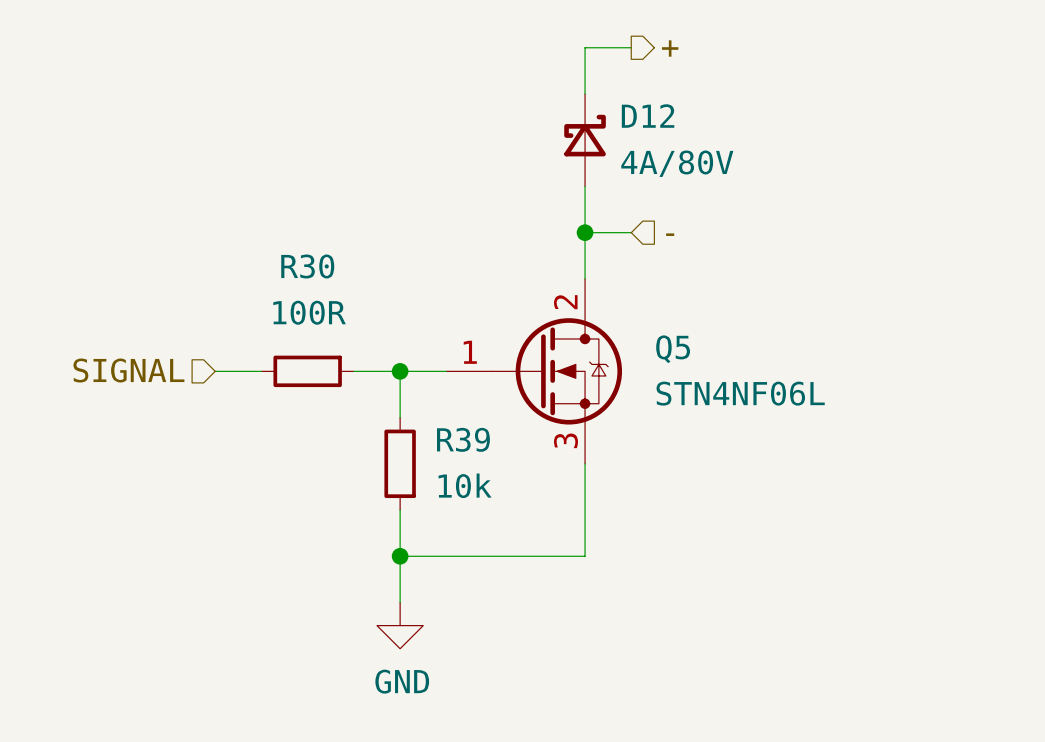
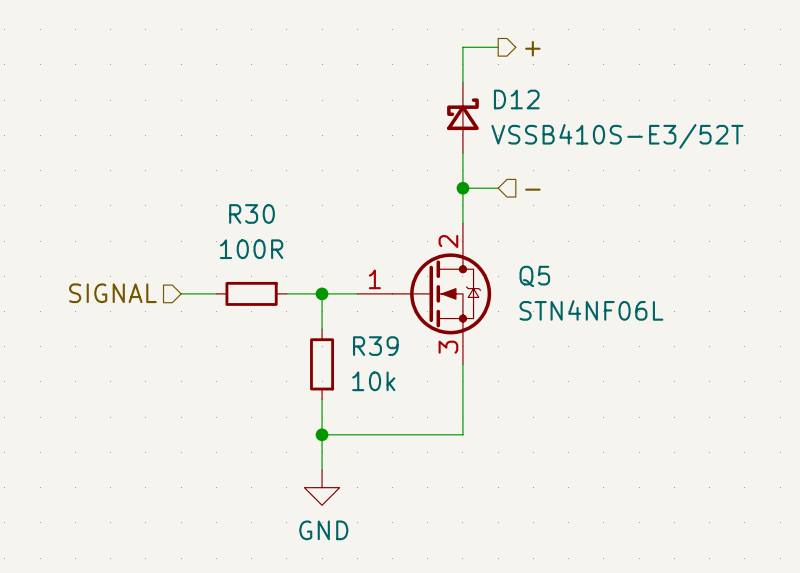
D12 value: 4A/80V (677, 163) -> VSSB410S-E3/52T (617, 136)

